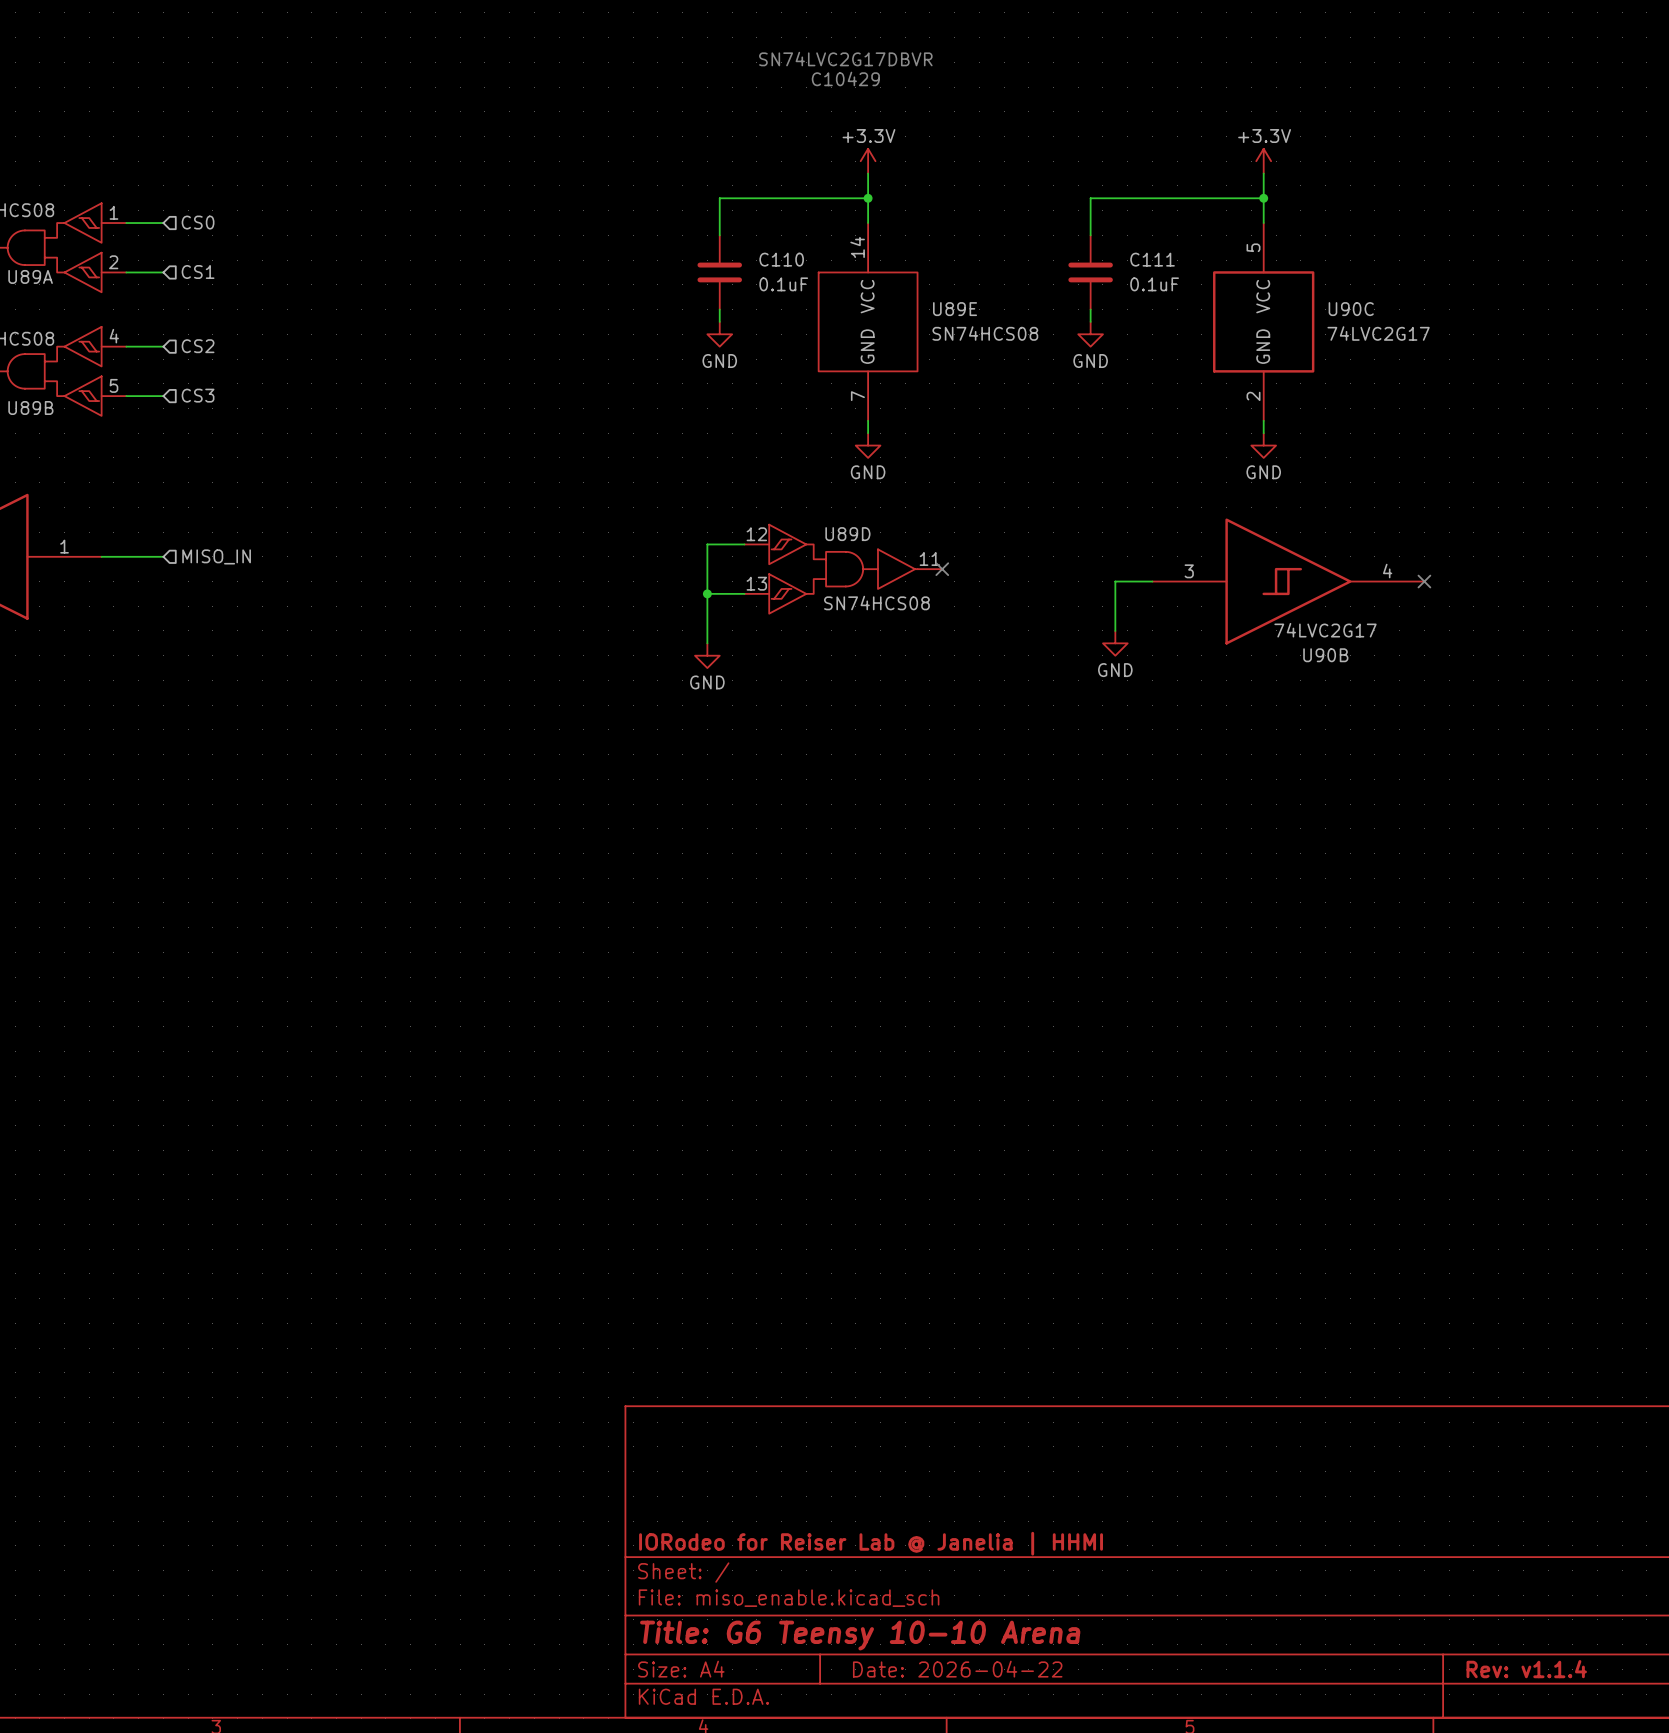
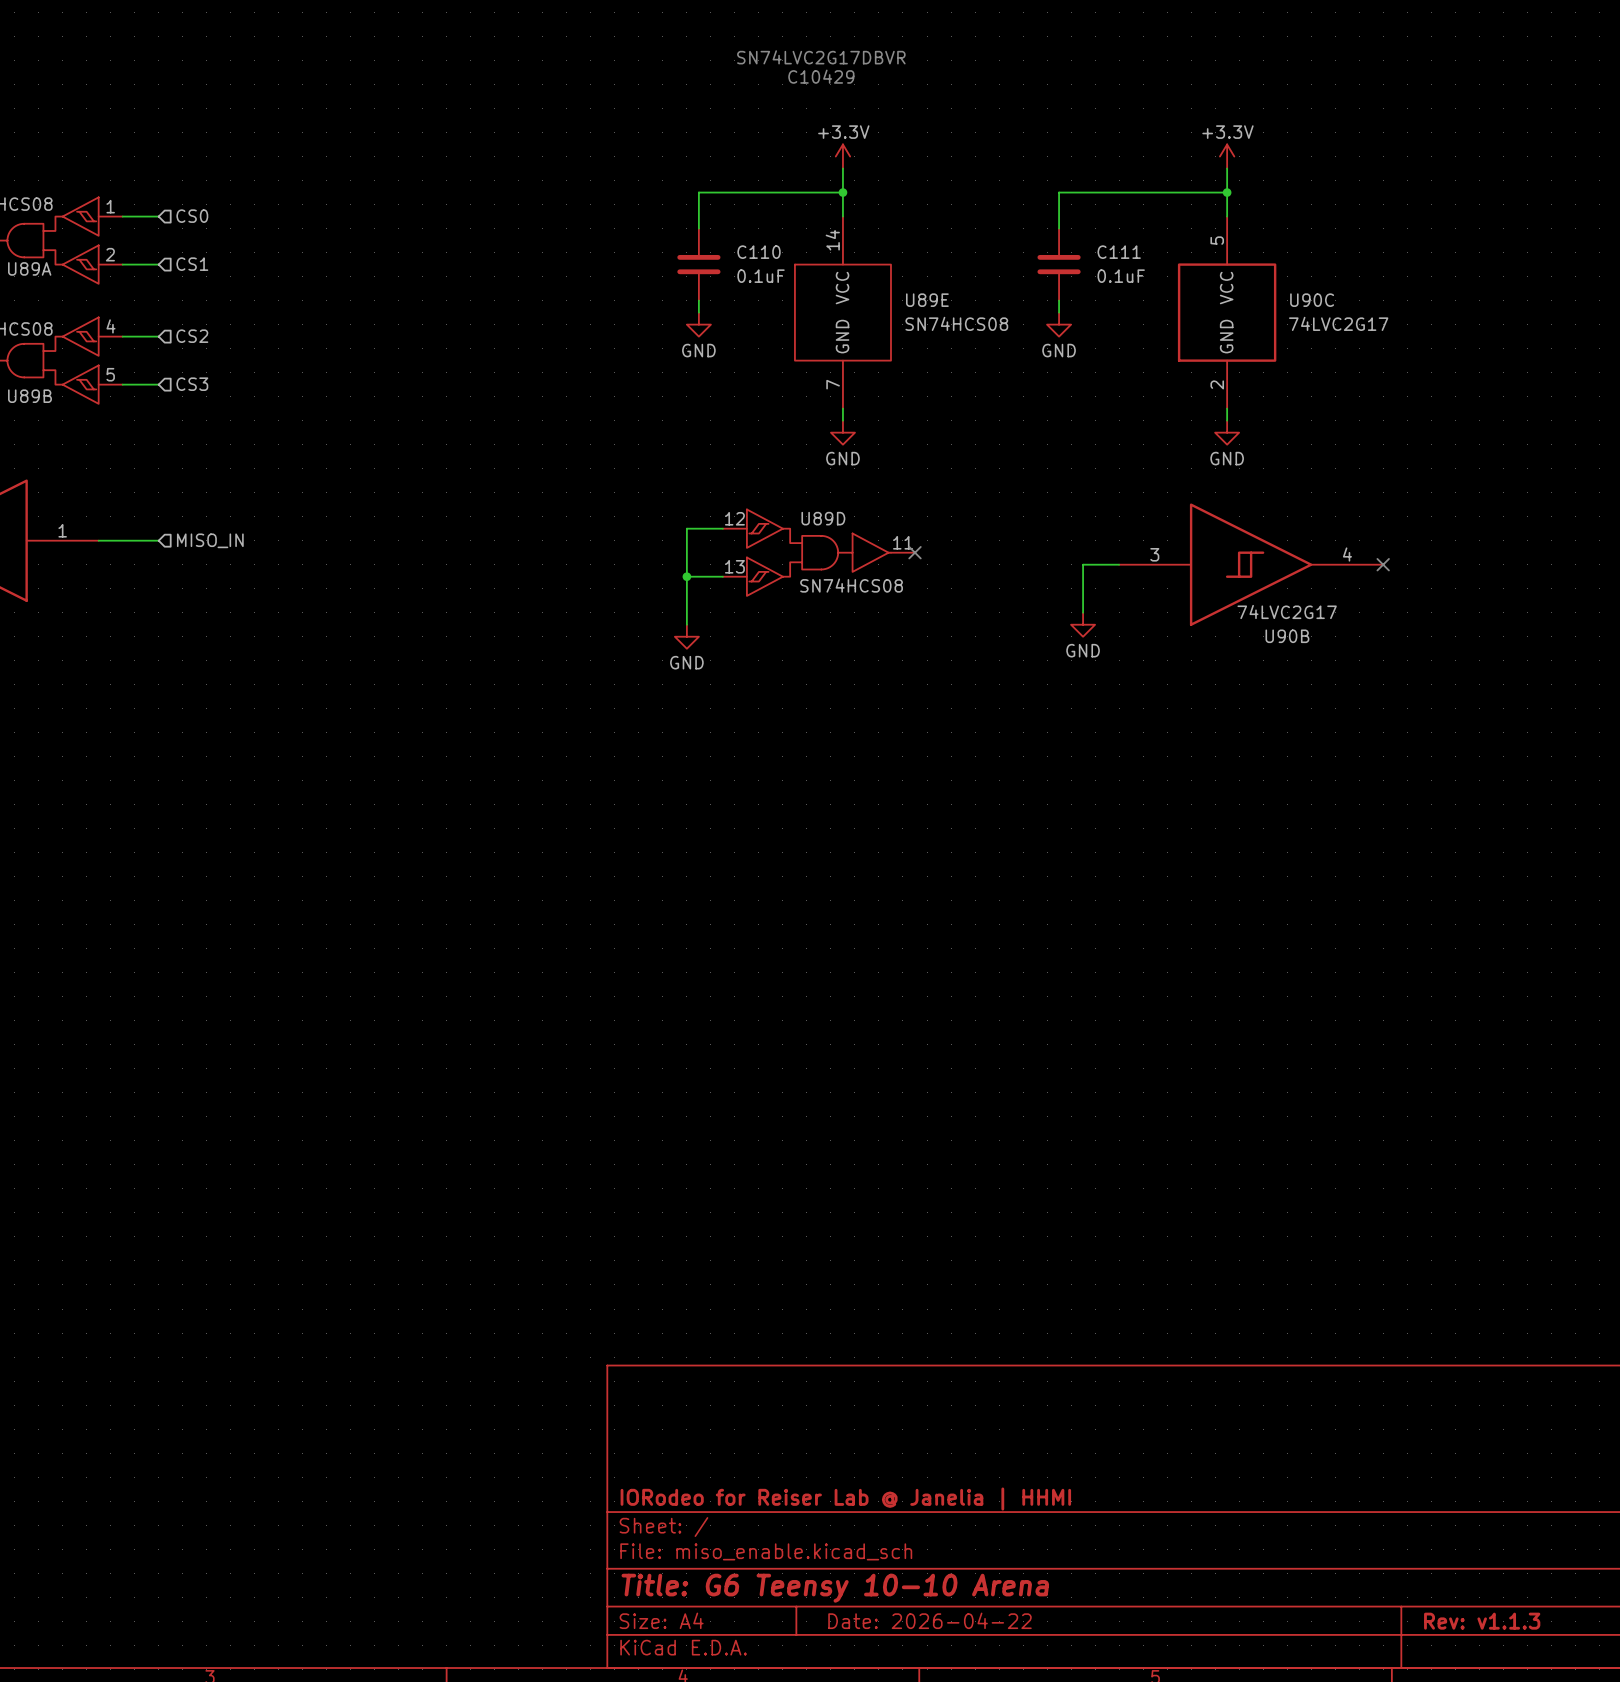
title block: Rev: v1.1.4 (1526, 1669) -> Rev: v1.1.3 (1482, 1621)

